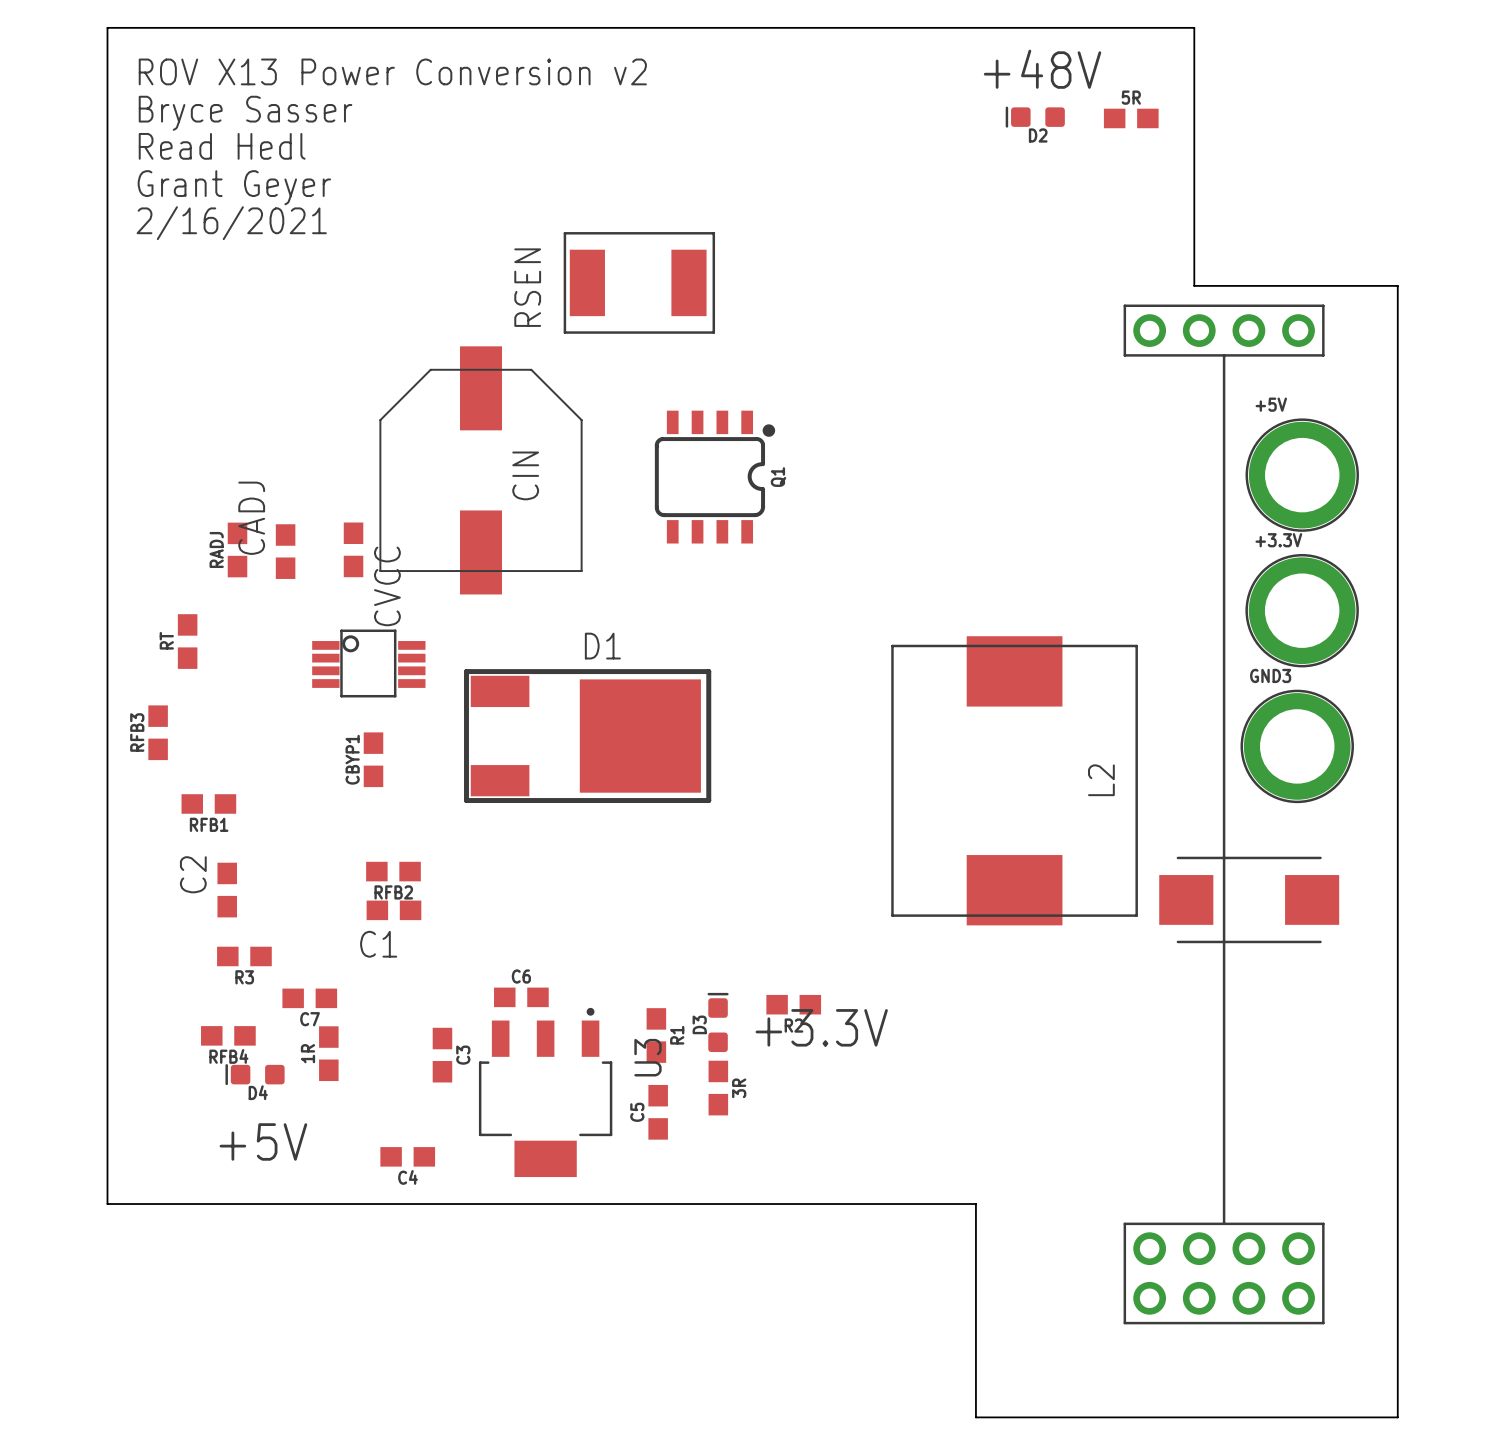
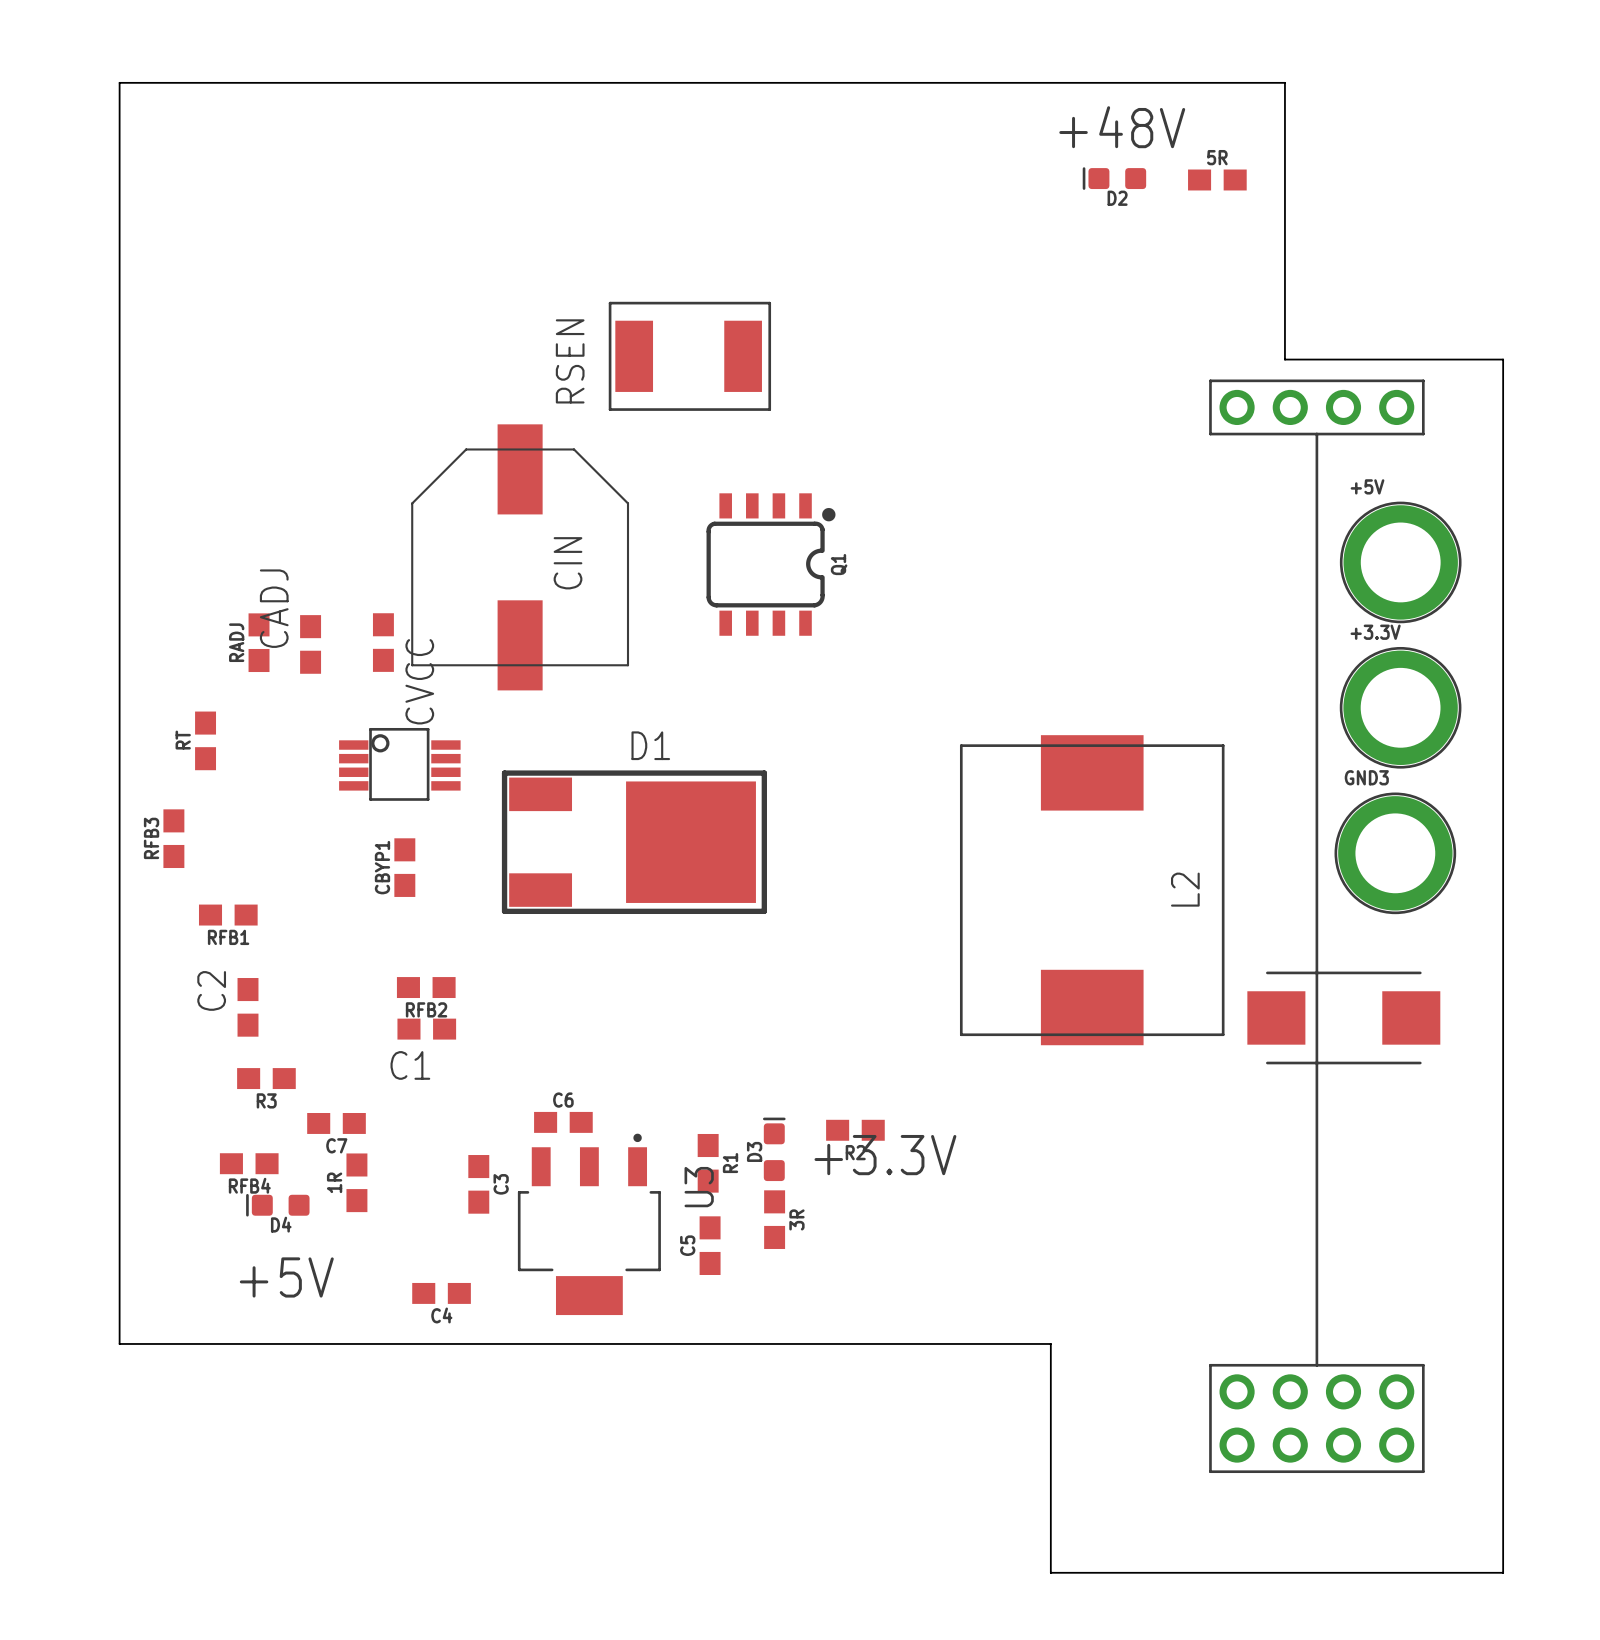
text: ROV X13 Power Conversion v2 (392, 71) -> none
text: Bryce Sasser (245, 113) -> none
text: Read Hedl (222, 146) -> none
text: Grant Geyer (234, 187) -> none
text: 2/16/2021 (231, 223) -> none

